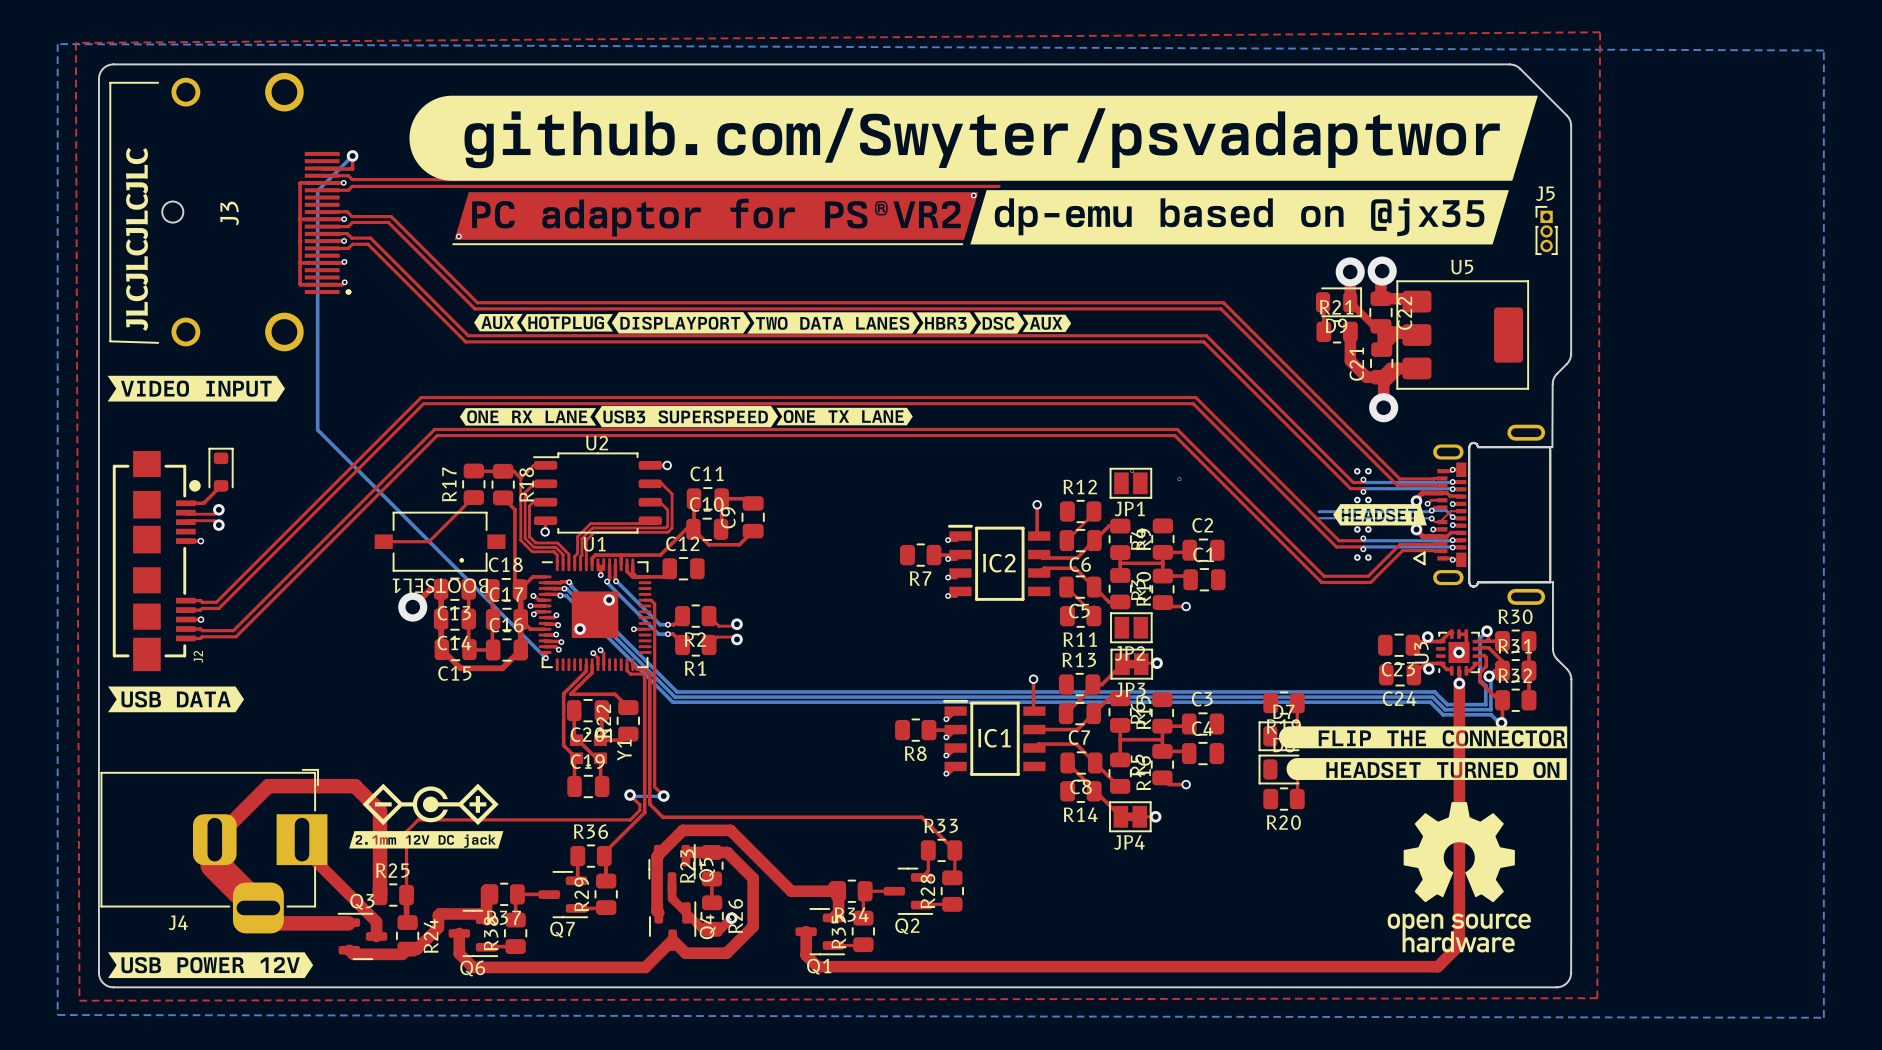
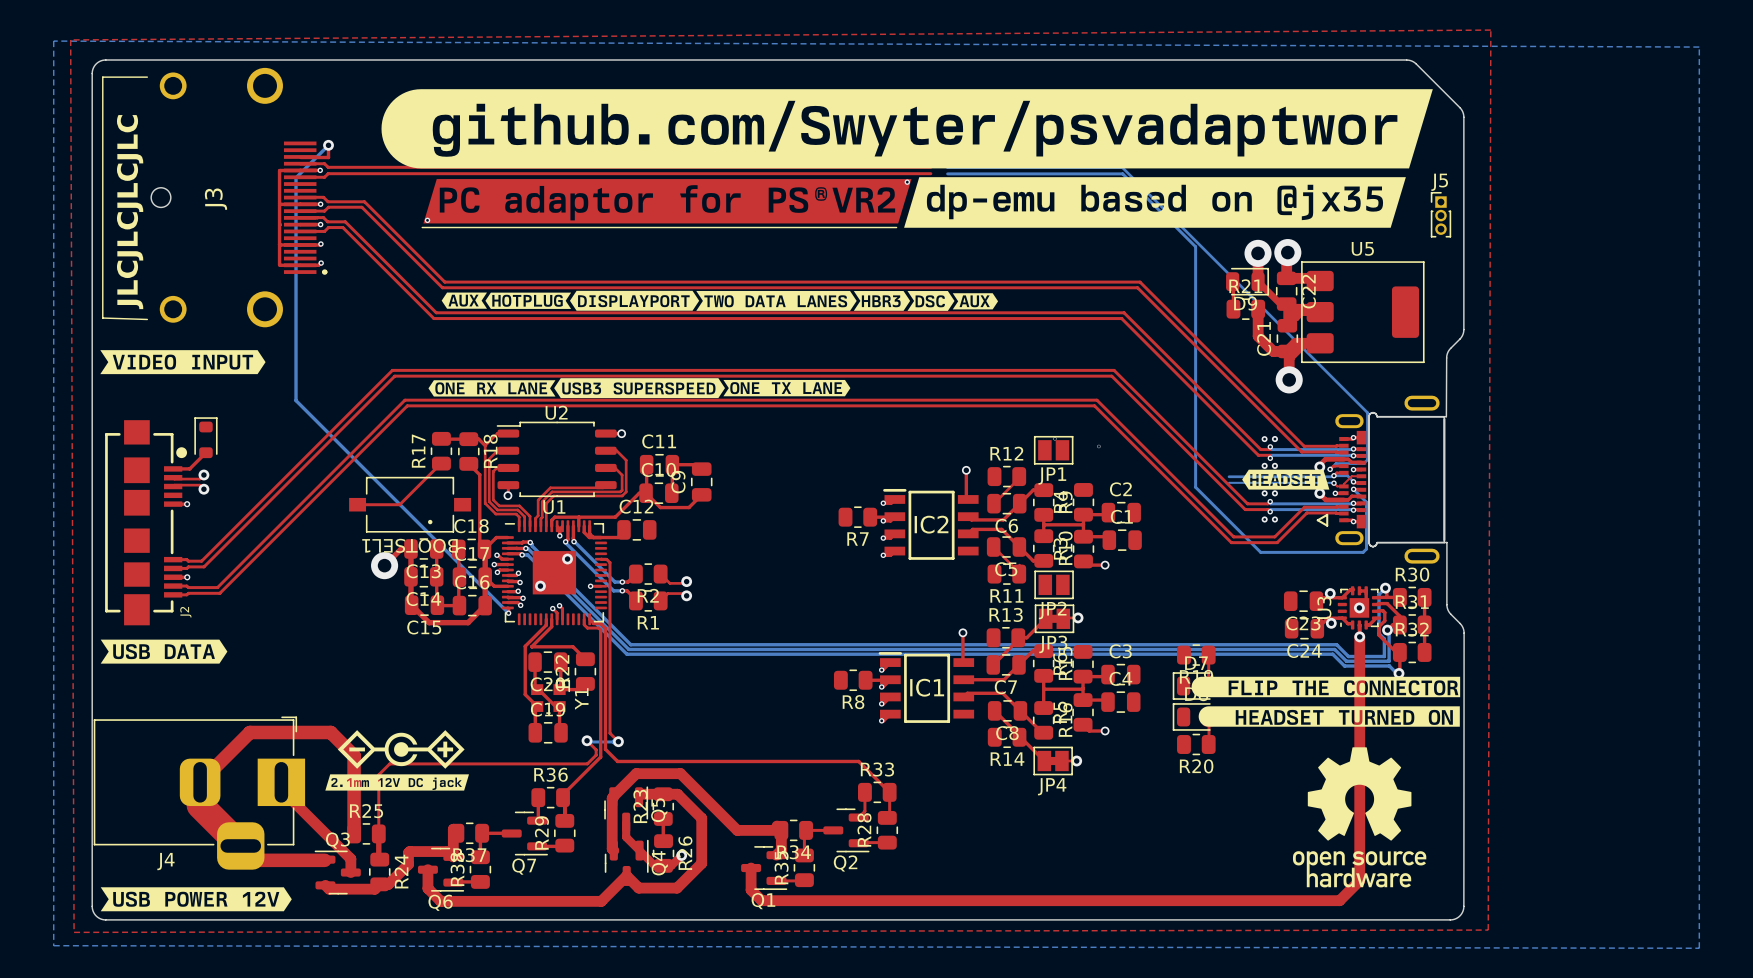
bottom track: none -> (947, 167) (1122, 167) (1367, 412) (1367, 459) (1363, 463) (1336, 463) (1330, 469)
bottom track: none -> (947, 173) (1122, 173) (1195, 246) (1195, 487) (1260, 552) (1363, 552) (1366, 548) (1366, 502) (1353, 489)

